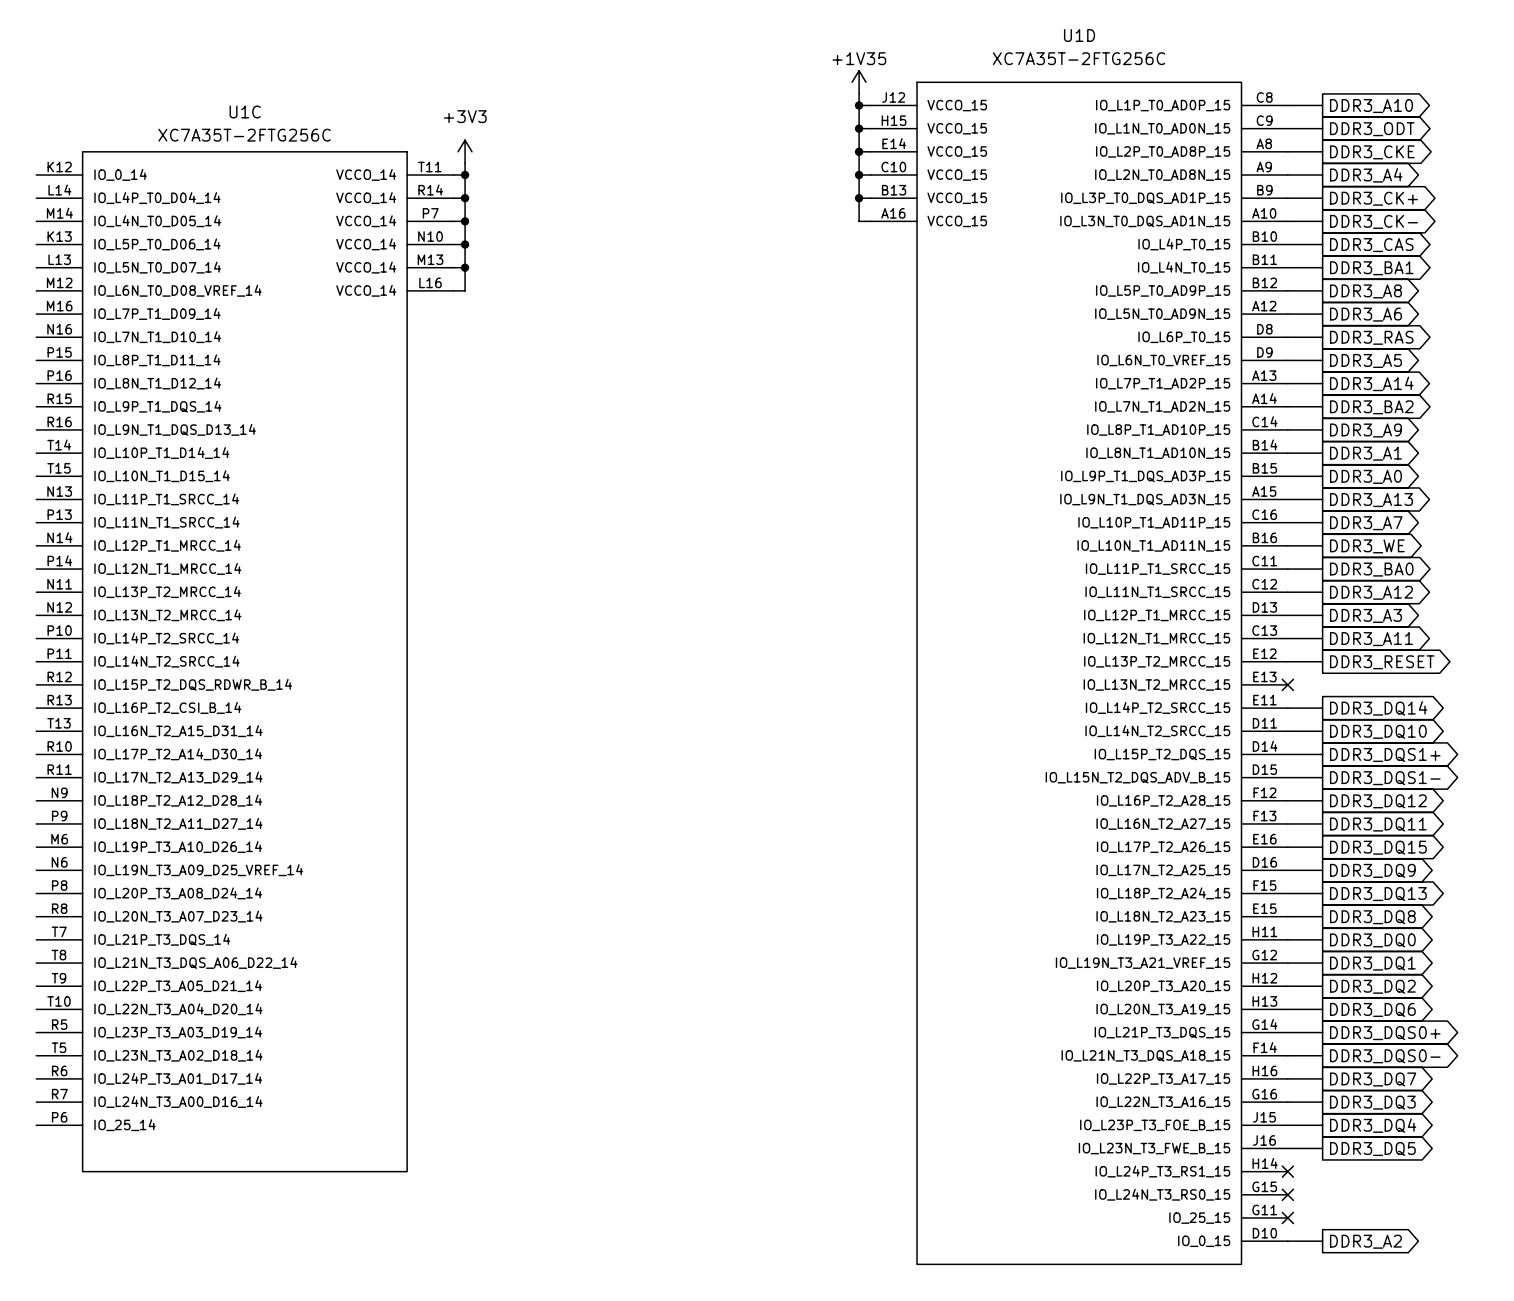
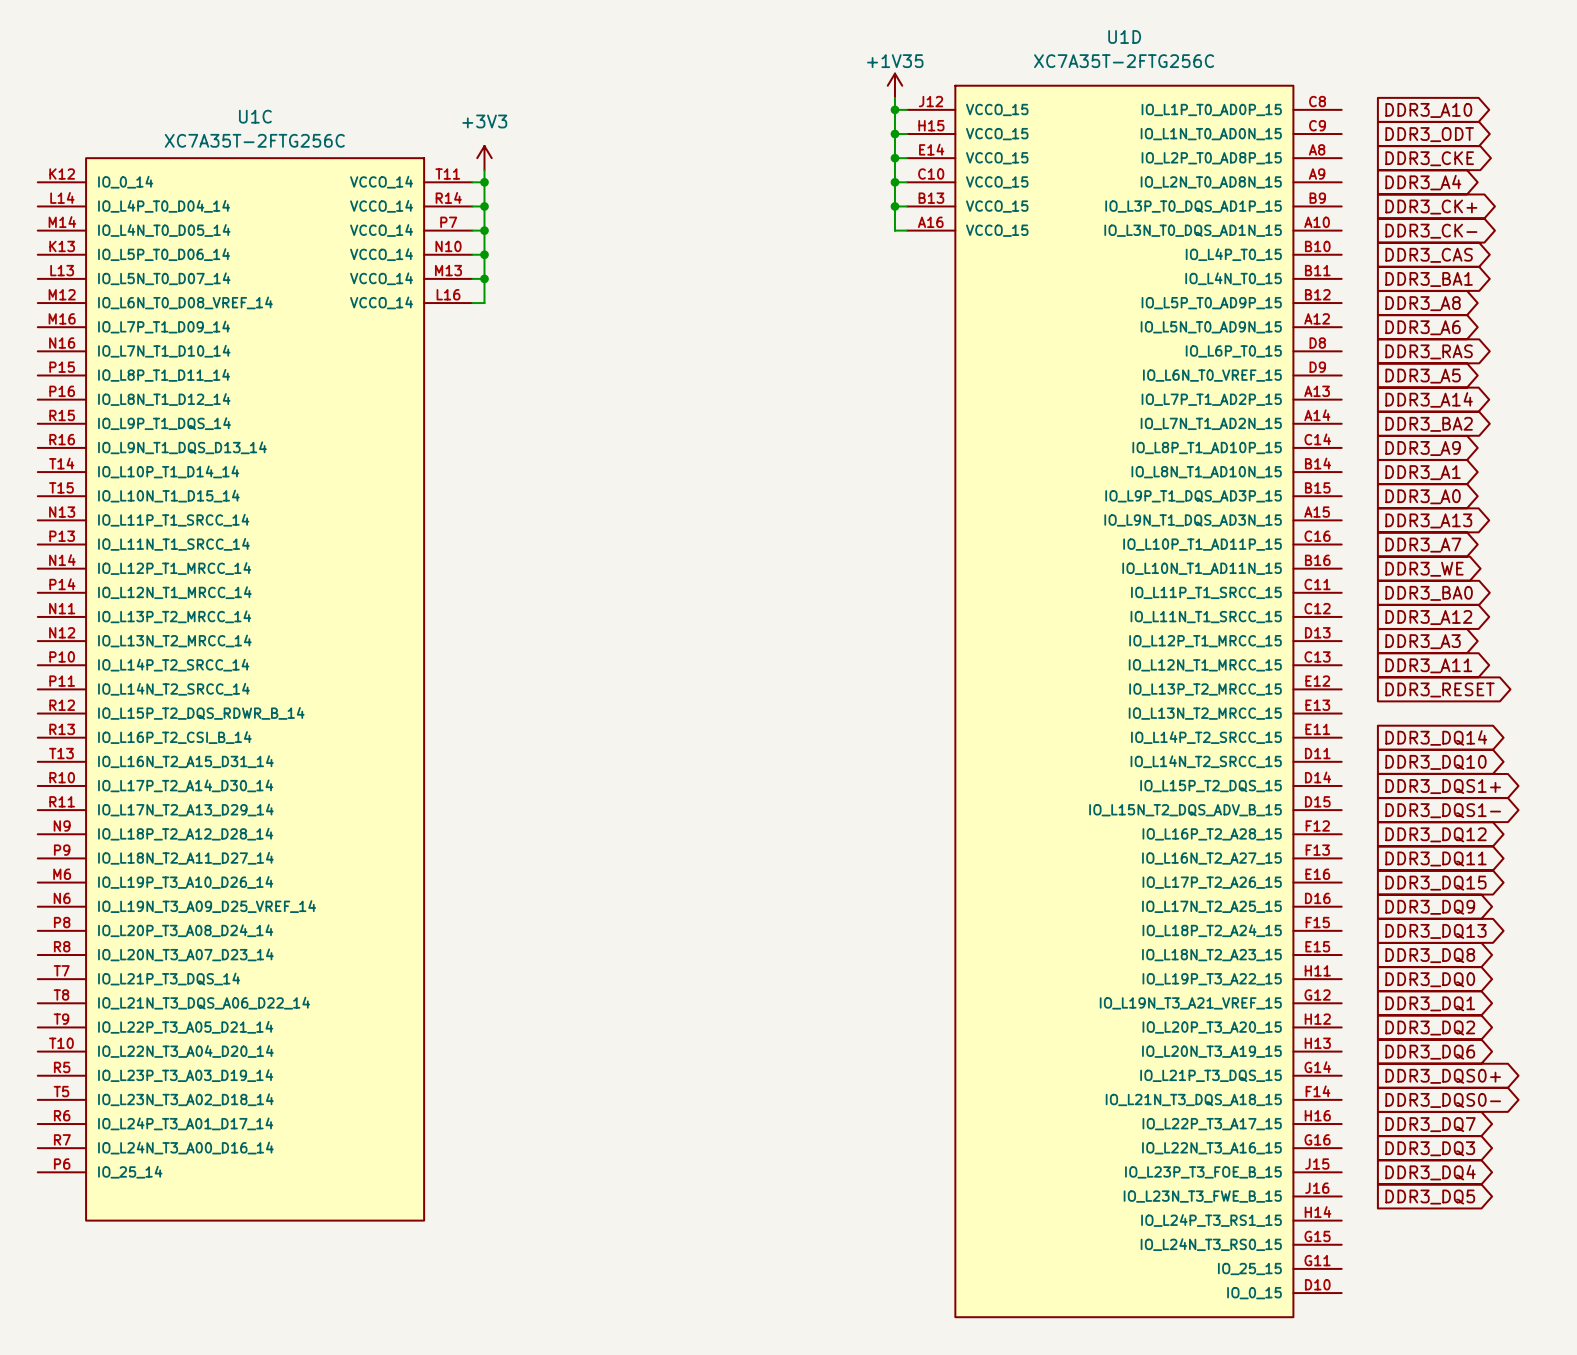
wire: (1287, 105) (1322, 105) -> none
wire: (1287, 128) (1322, 128) -> none
wire: (1287, 151) (1322, 151) -> none
wire: (1287, 175) (1322, 175) -> none
wire: (1287, 198) (1322, 198) -> none
wire: (1287, 221) (1322, 221) -> none
wire: (1287, 244) (1322, 244) -> none
wire: (1287, 267) (1322, 267) -> none
wire: (1287, 290) (1322, 290) -> none
wire: (1287, 314) (1322, 314) -> none
wire: (1287, 337) (1322, 337) -> none
wire: (1287, 360) (1322, 360) -> none
wire: (1287, 383) (1322, 383) -> none
wire: (1287, 406) (1322, 406) -> none
wire: (1287, 429) (1322, 429) -> none
wire: (1287, 453) (1322, 453) -> none
wire: (1287, 476) (1322, 476) -> none
wire: (1287, 499) (1322, 499) -> none
wire: (1287, 522) (1322, 522) -> none
wire: (1287, 545) (1322, 545) -> none
wire: (1287, 569) (1322, 569) -> none
wire: (1287, 592) (1322, 592) -> none
wire: (1287, 615) (1322, 615) -> none
wire: (1287, 638) (1322, 638) -> none
wire: (1287, 661) (1322, 661) -> none
no-connect mark: (1287, 684) -> none
wire: (1287, 708) (1322, 708) -> none
wire: (1287, 731) (1322, 731) -> none
wire: (1287, 754) (1322, 754) -> none
wire: (1287, 777) (1322, 777) -> none
wire: (1287, 800) (1322, 800) -> none
wire: (1287, 823) (1322, 823) -> none
wire: (1287, 847) (1322, 847) -> none
wire: (1287, 870) (1322, 870) -> none
wire: (1287, 893) (1322, 893) -> none
wire: (1287, 916) (1322, 916) -> none
wire: (1287, 939) (1322, 939) -> none
wire: (1287, 963) (1322, 963) -> none
wire: (1287, 986) (1322, 986) -> none
wire: (1287, 1009) (1322, 1009) -> none
wire: (1287, 1032) (1322, 1032) -> none
wire: (1287, 1055) (1322, 1055) -> none
wire: (1287, 1078) (1322, 1078) -> none
wire: (1287, 1102) (1322, 1102) -> none
wire: (1287, 1125) (1322, 1125) -> none
wire: (1287, 1148) (1322, 1148) -> none
no-connect mark: (1287, 1171) -> none
no-connect mark: (1287, 1194) -> none
no-connect mark: (1287, 1218) -> none
wire: (1287, 1241) (1322, 1241) -> none
global label: DDR3_A2 (1365, 1241) -> none

